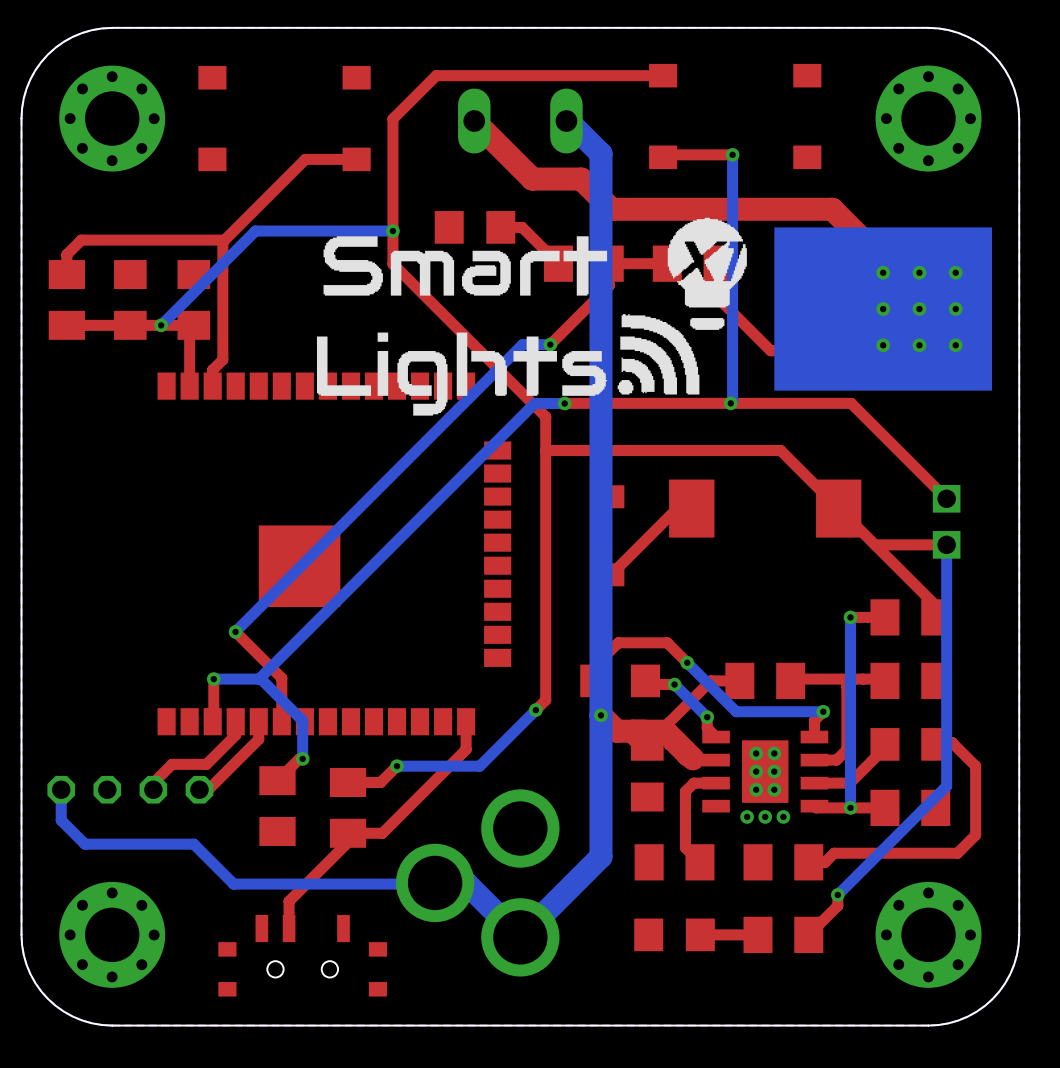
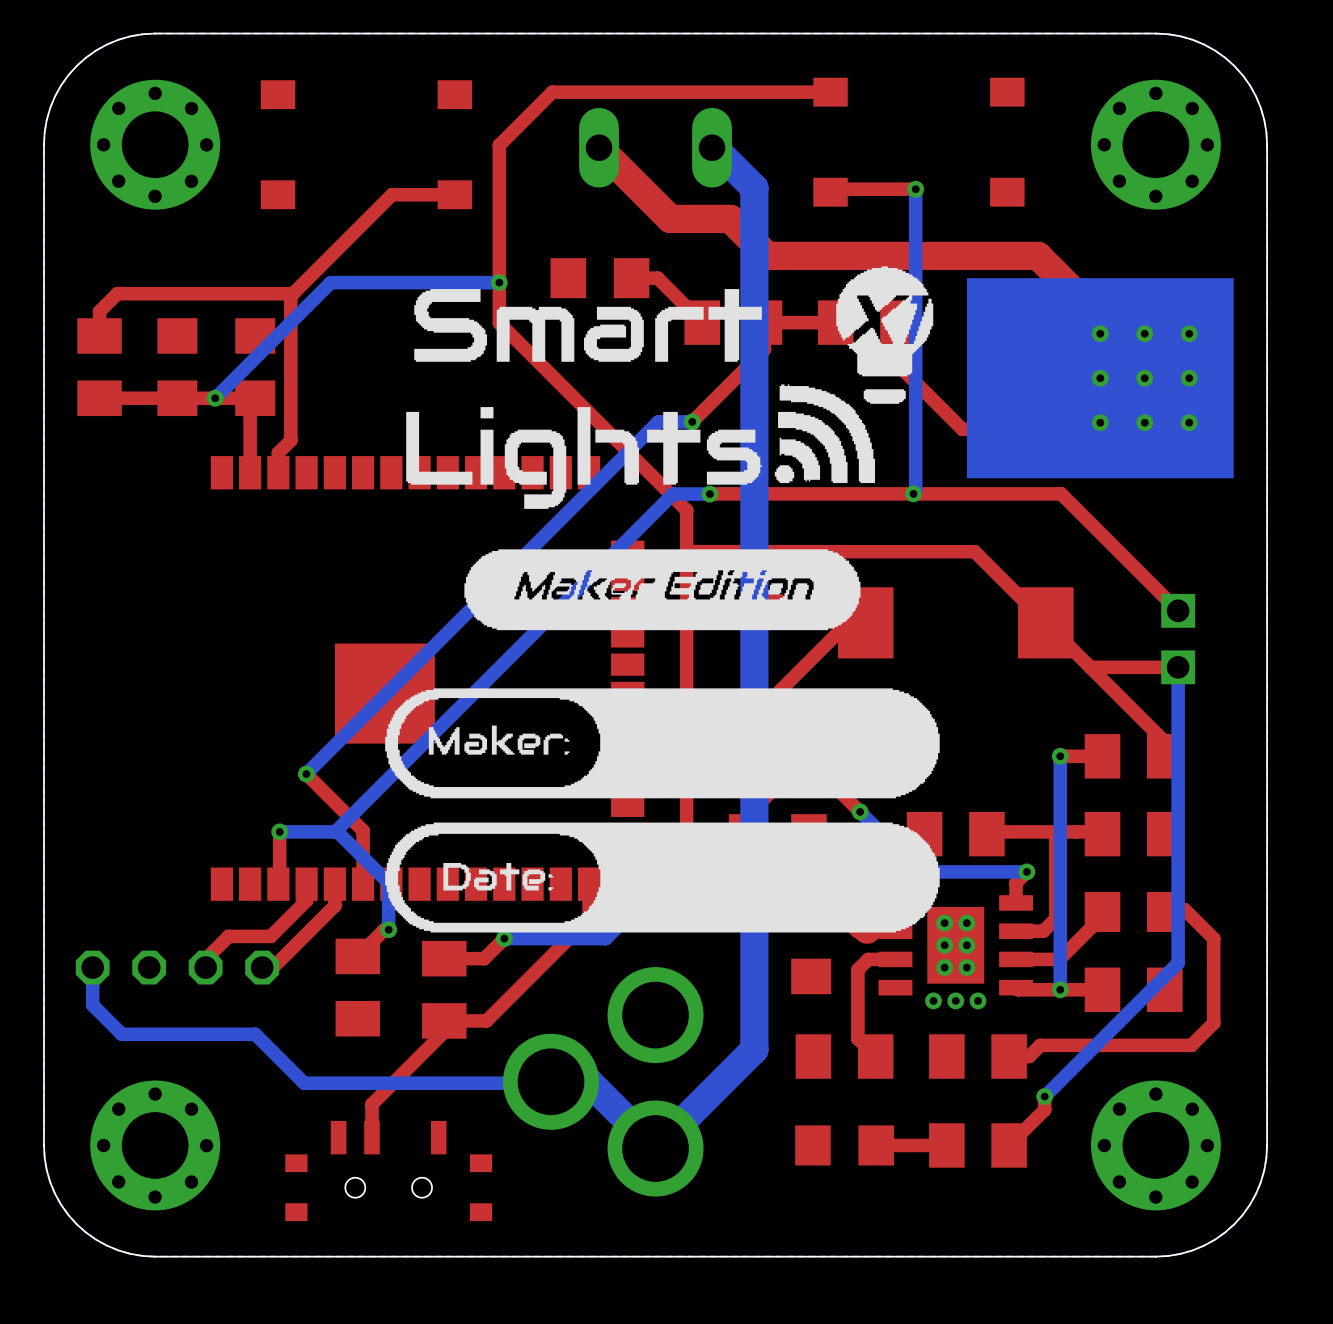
drawing: none -> [464, 549, 861, 631]
drawing: none -> [385, 688, 940, 933]
drawing: none -> [443, 862, 554, 891]

